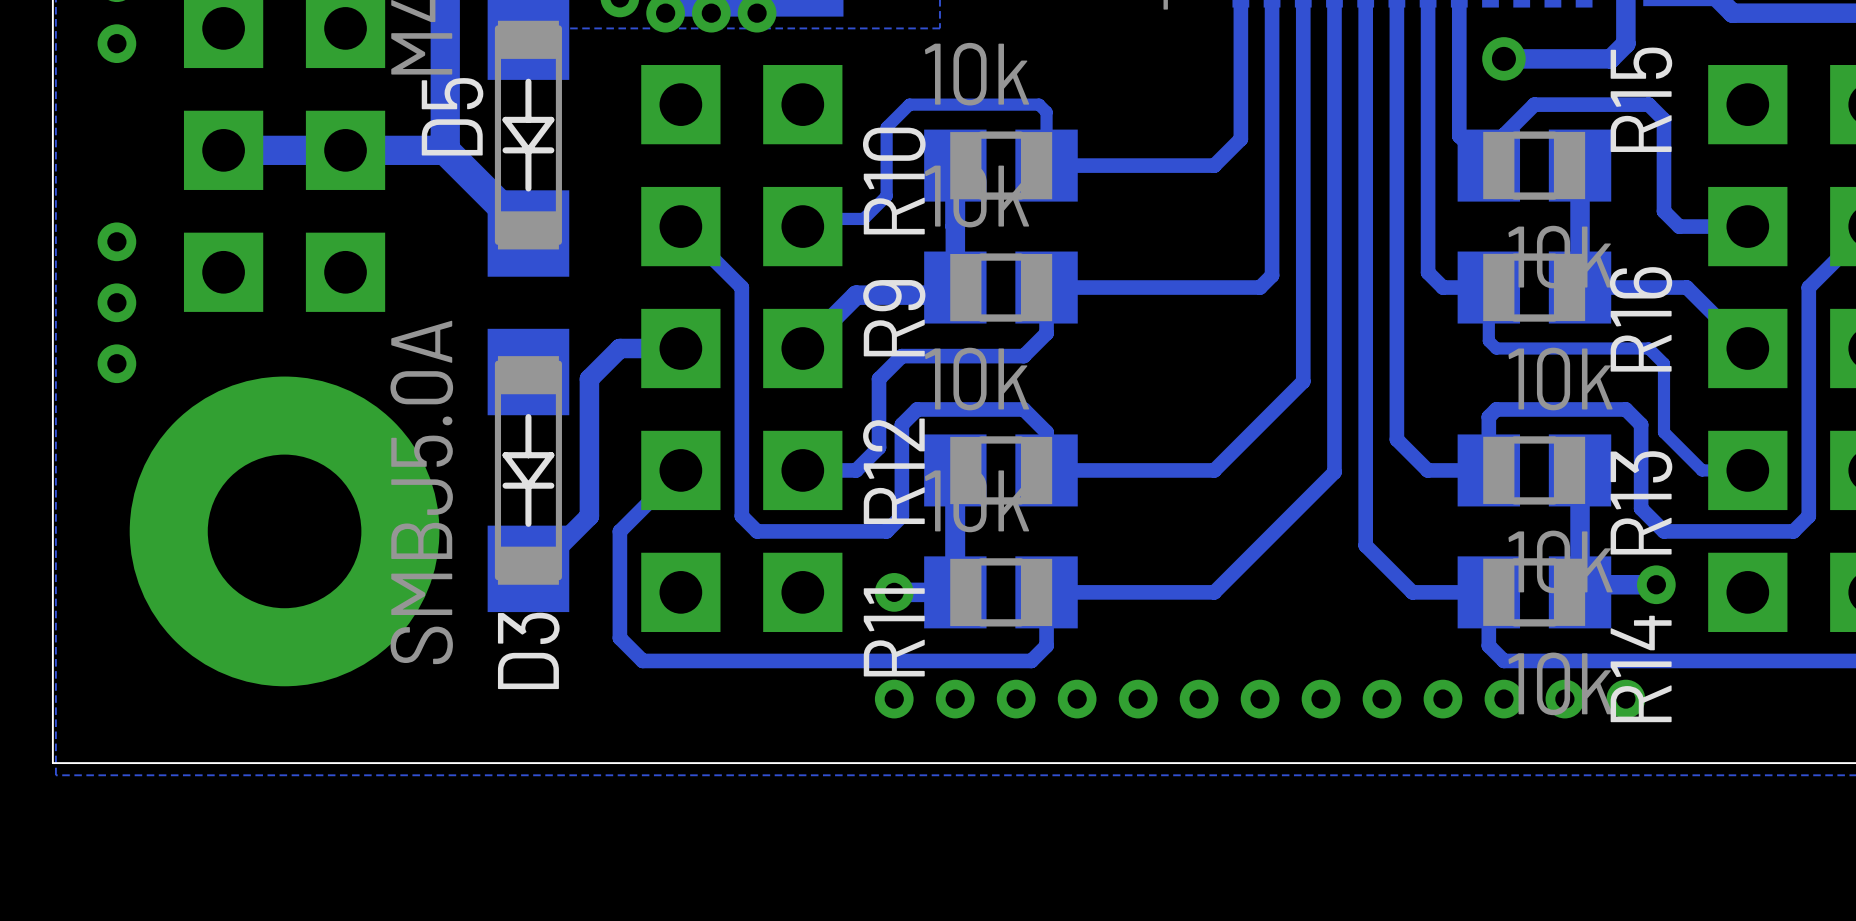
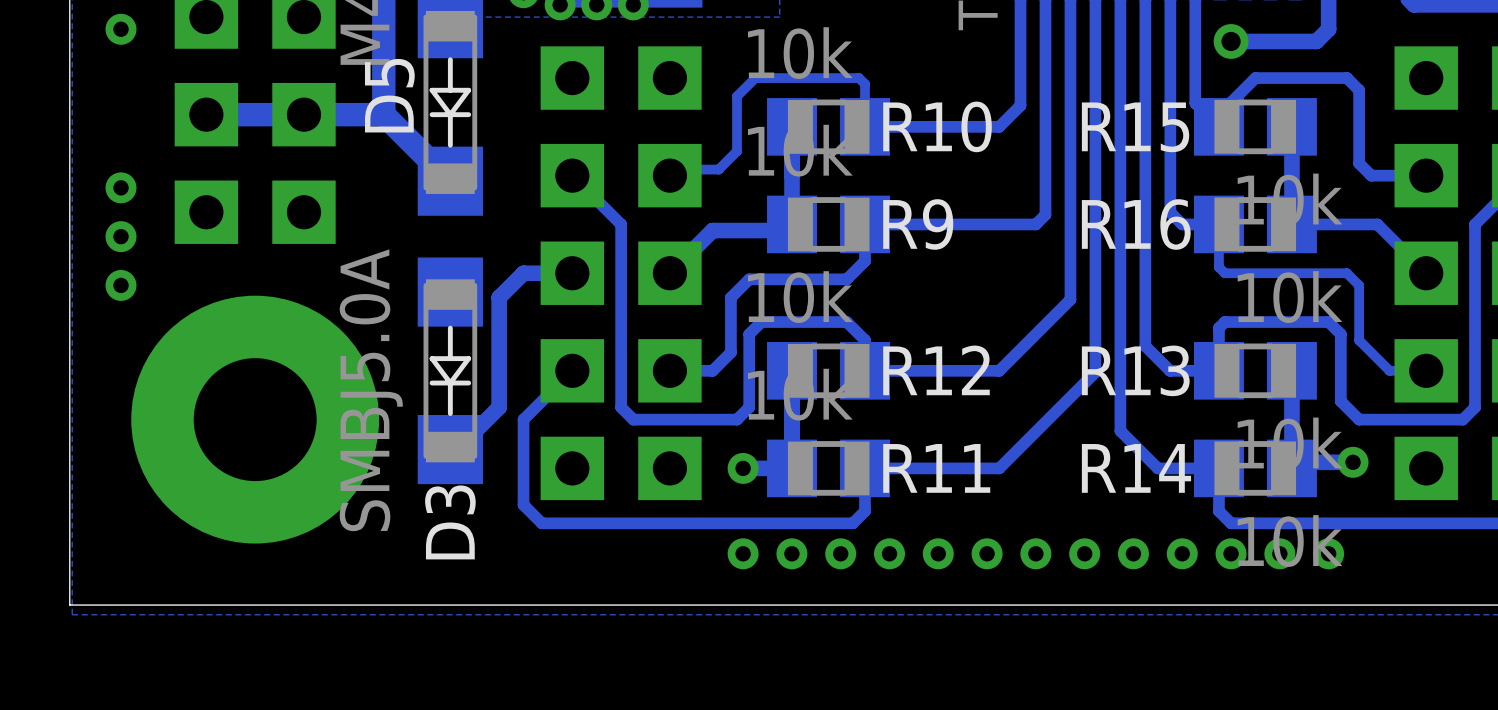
R15 name rotation: 0° (1641, 99) -> 90° clockwise (1135, 127)
R15 name position: R15 (1641, 99) -> R15 (1135, 127)
R10 name rotation: 0° (894, 181) -> 90° clockwise (937, 126)
R10 name position: R10 (894, 181) -> R10 (937, 126)
R9 name rotation: 0° (894, 318) -> 90° clockwise (918, 224)
R9 name position: R9 (894, 318) -> R9 (918, 224)
R16 name rotation: 0° (1641, 319) -> 90° clockwise (1136, 224)
R16 name position: R16 (1641, 319) -> R16 (1136, 224)
R12 name rotation: 0° (893, 471) -> 90° clockwise (936, 370)
R12 name position: R12 (893, 471) -> R12 (936, 370)
R13 name rotation: 0° (1641, 502) -> 90° clockwise (1135, 370)
R13 name position: R13 (1641, 502) -> R13 (1135, 370)
R11 name rotation: 0° (894, 632) -> 90° clockwise (936, 468)
R11 name position: R11 (894, 632) -> R11 (936, 468)
R14 name rotation: 0° (1641, 668) -> 90° clockwise (1136, 468)
R14 name position: R14 (1641, 668) -> R14 (1136, 468)

